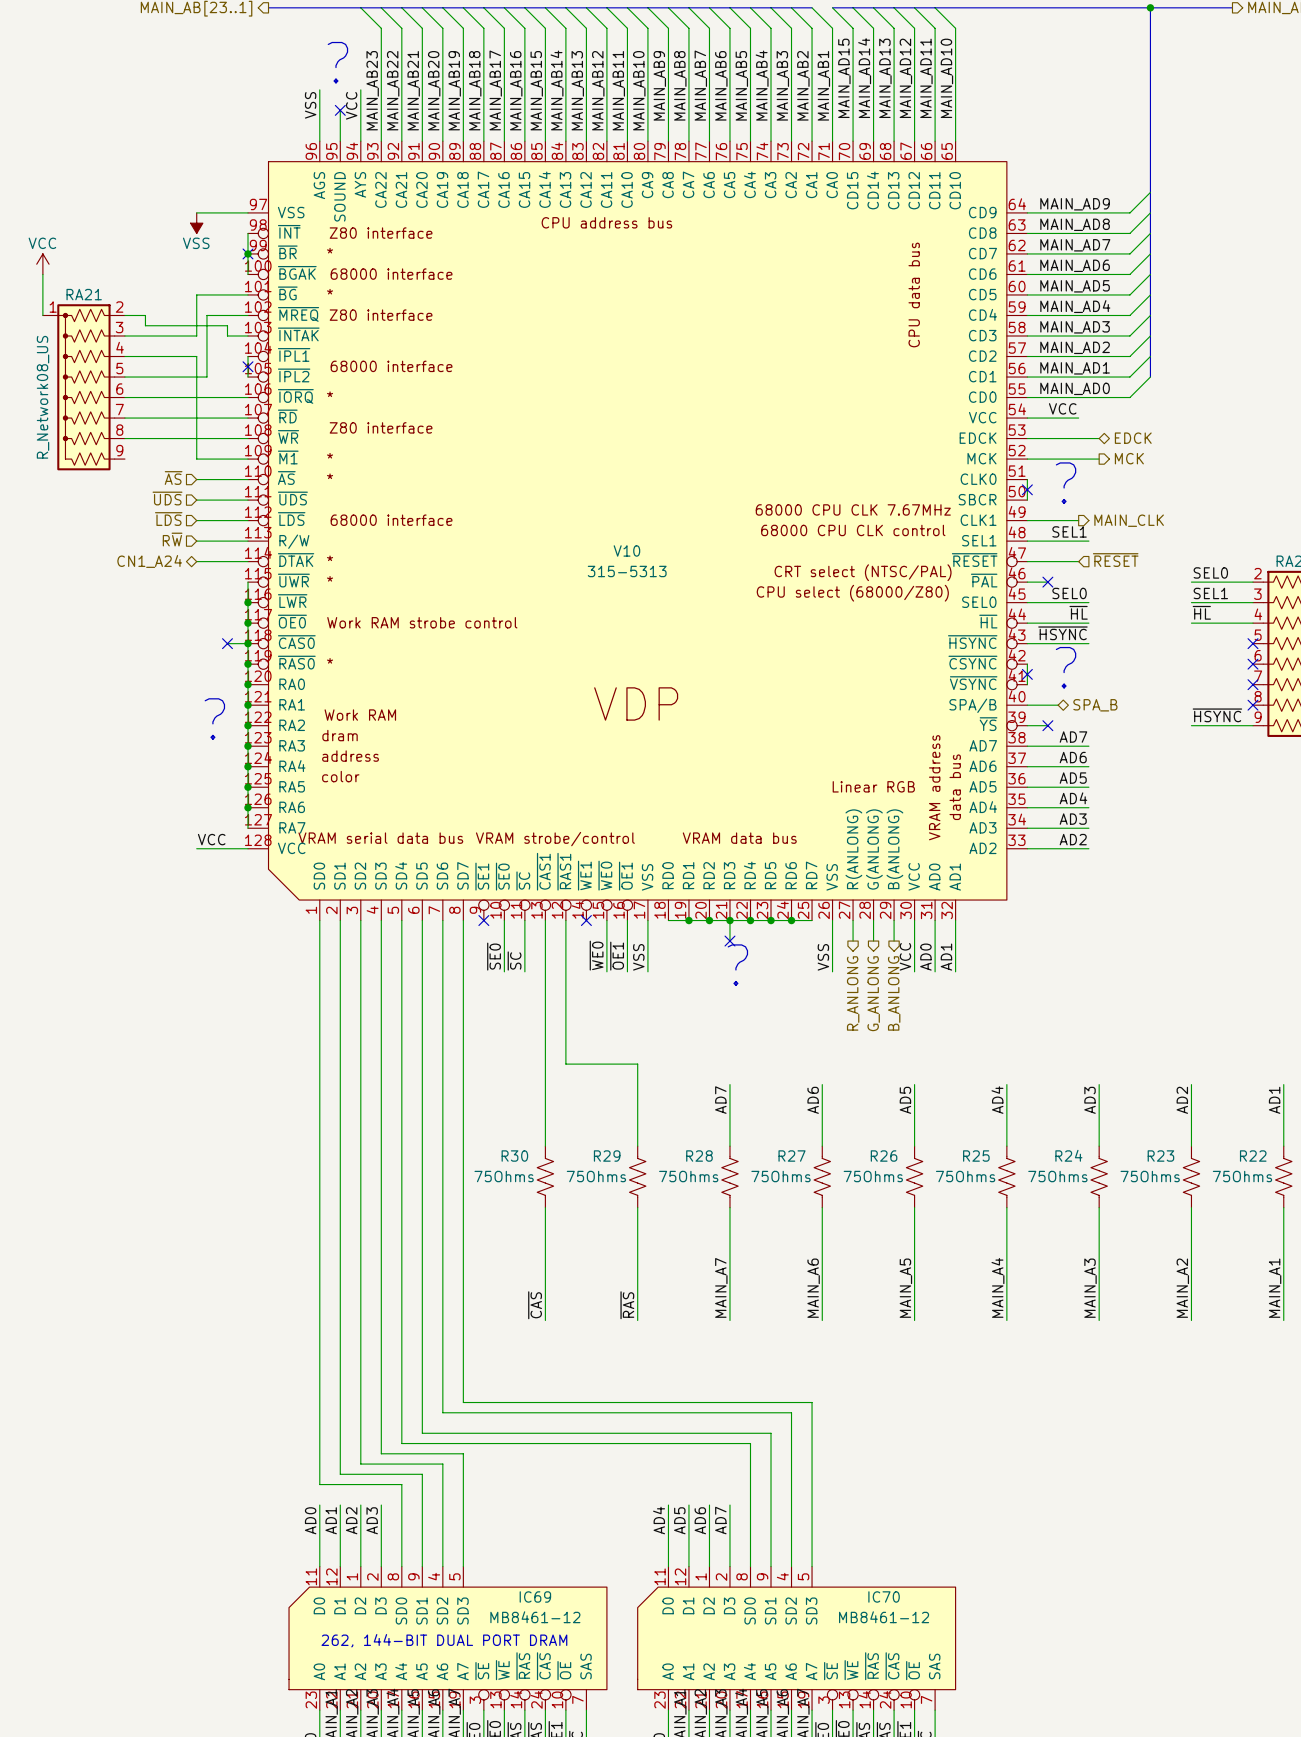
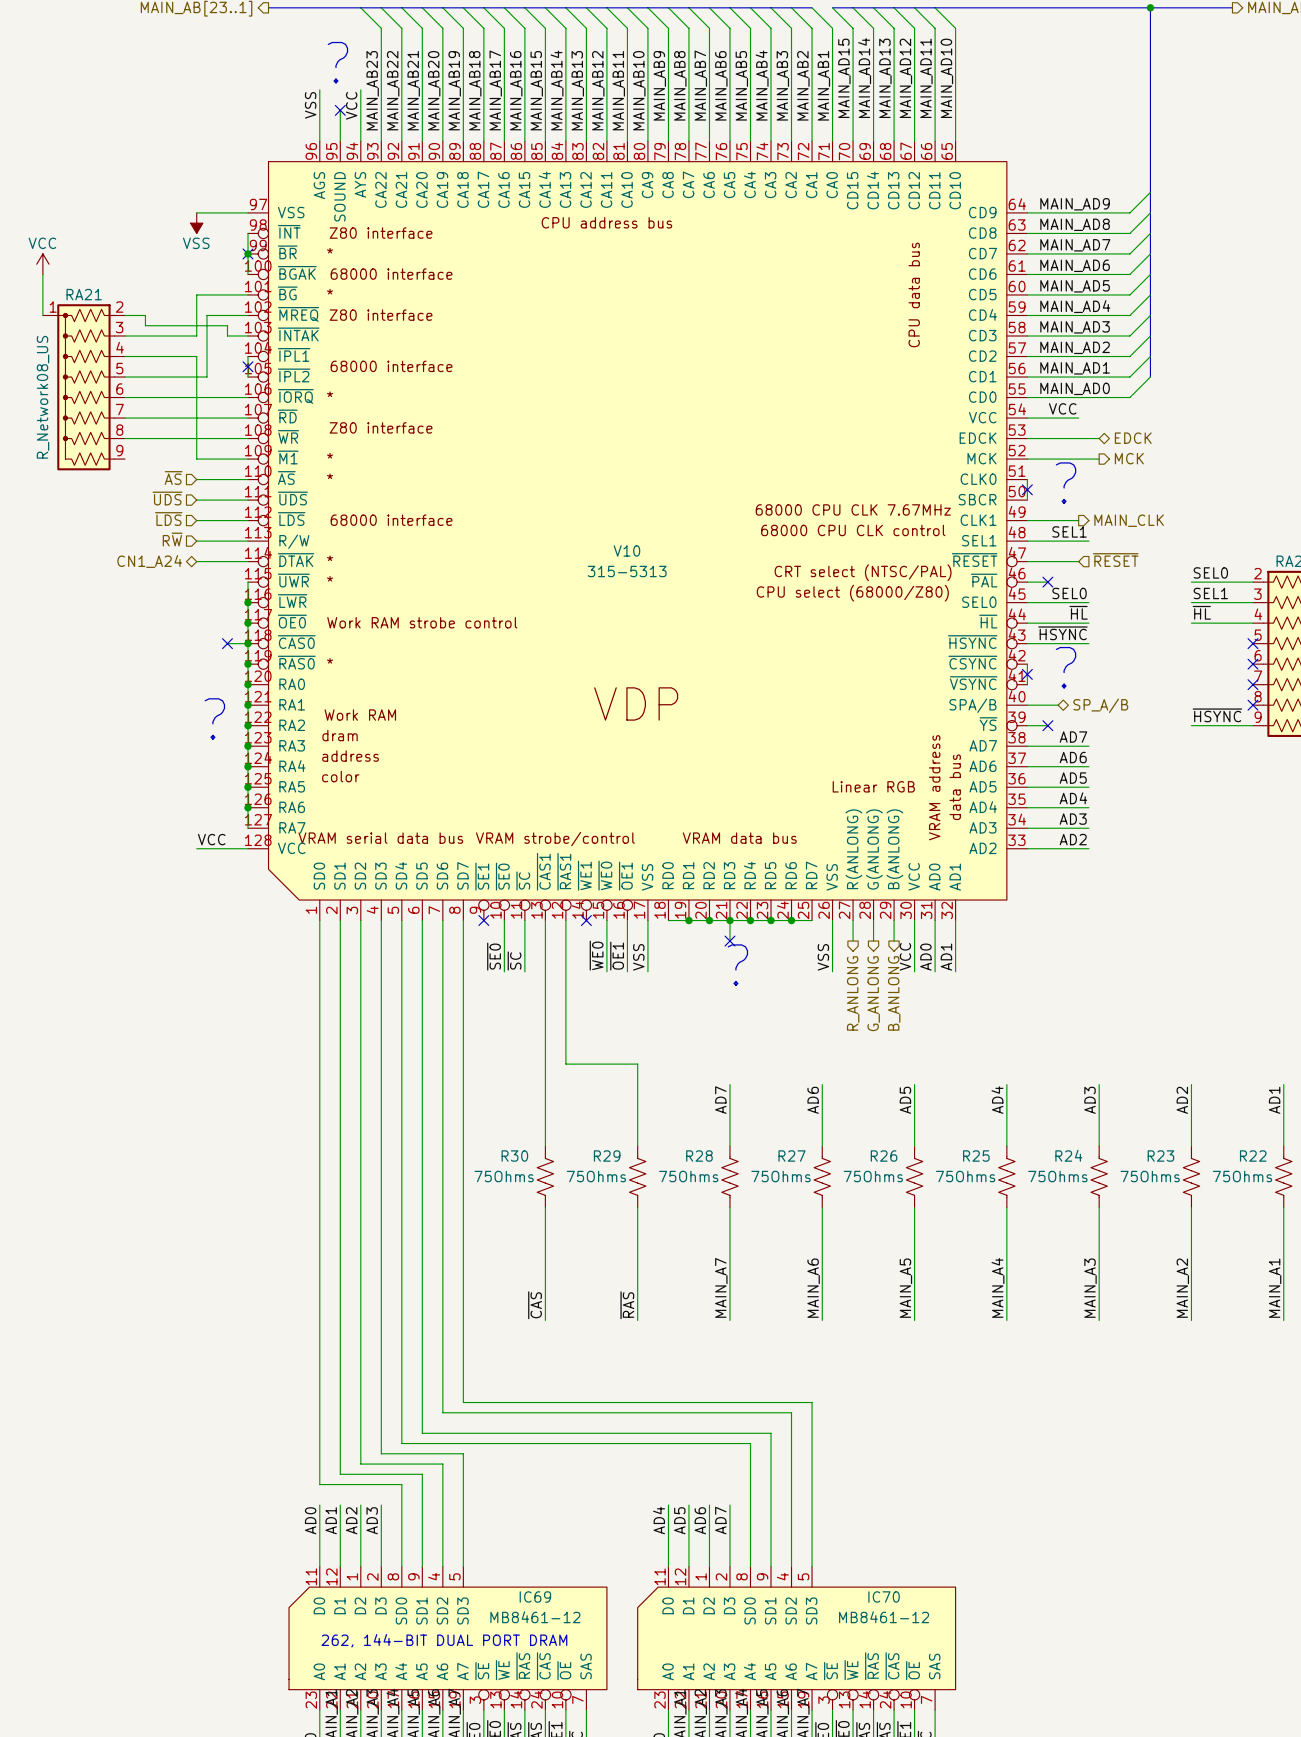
hierarchical label: SPA_B (1095, 705) -> SP_A/B (1100, 705)

